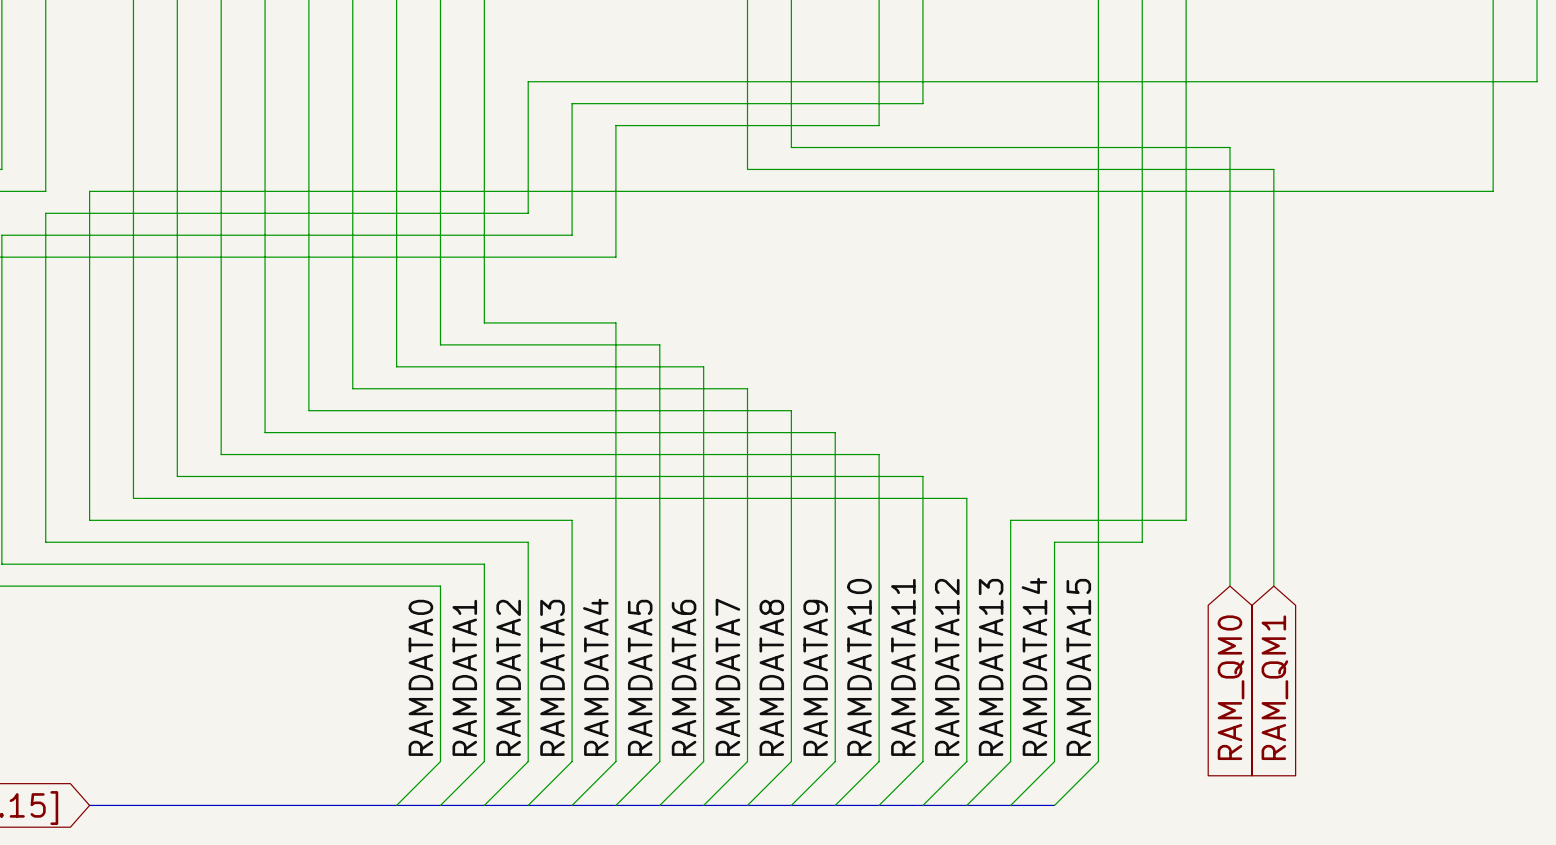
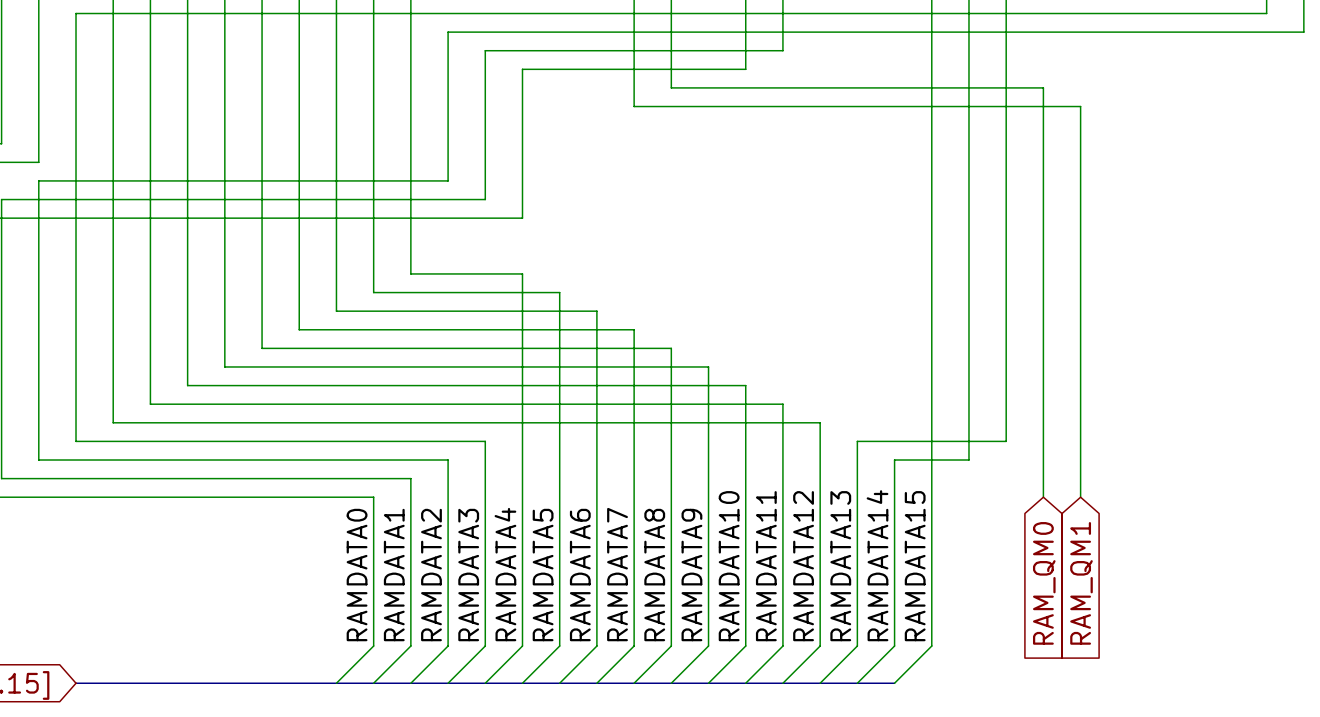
wire: (1493, 15) (1493, 191) (89, 191) -> (1266, 13) (76, 13) (76, 162)
wire: (1537, 37) (1537, 81) (879, 81) (879, 125) -> (1303, 32) (448, 32) (448, 69)
wire: (922, 59) (922, 103) -> (1043, 125) (1043, 87) (782, 87)
wire: (528, 81) (615, 81) -> (522, 106) (522, 69)
wire: (572, 103) (791, 103) (791, 147) (1229, 147) -> (485, 87) (485, 50) (782, 50)
wire: (615, 125) (747, 125) (747, 169) (1273, 169) -> (745, 106) (1080, 106) (1080, 143)

